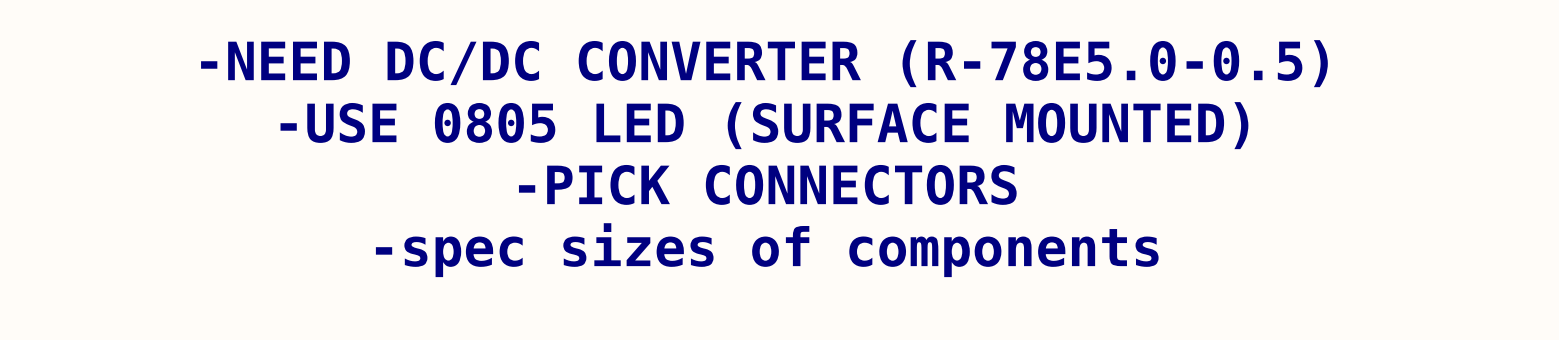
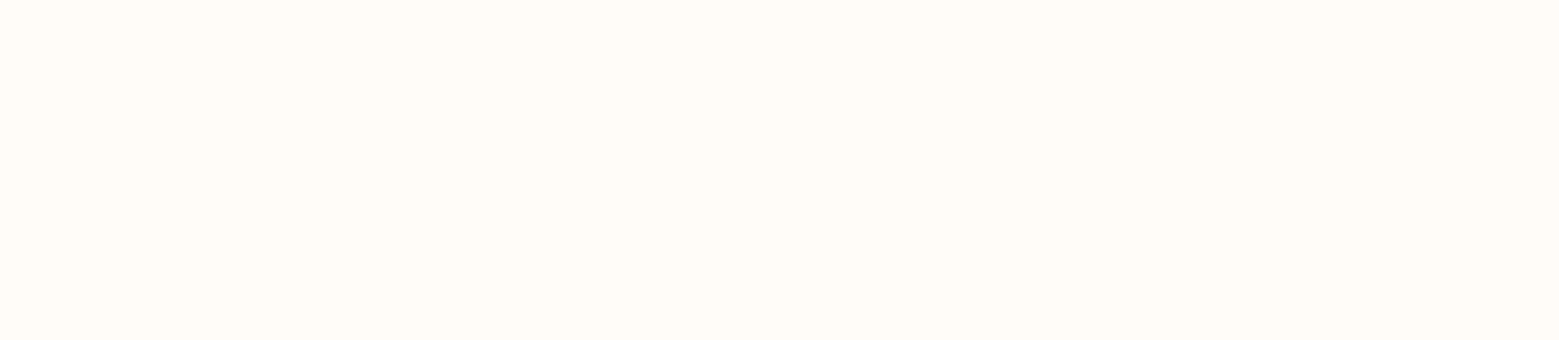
text: -NEED DC/DC CONVERTER (R-78E5.0-0.5) (764, 63) -> none
text: -USE 0805 LED (SURFACE MOUNTED) (764, 125) -> none
text: -PICK CONNECTORS (767, 184) -> none
text: -spec sizes of components (767, 250) -> none

